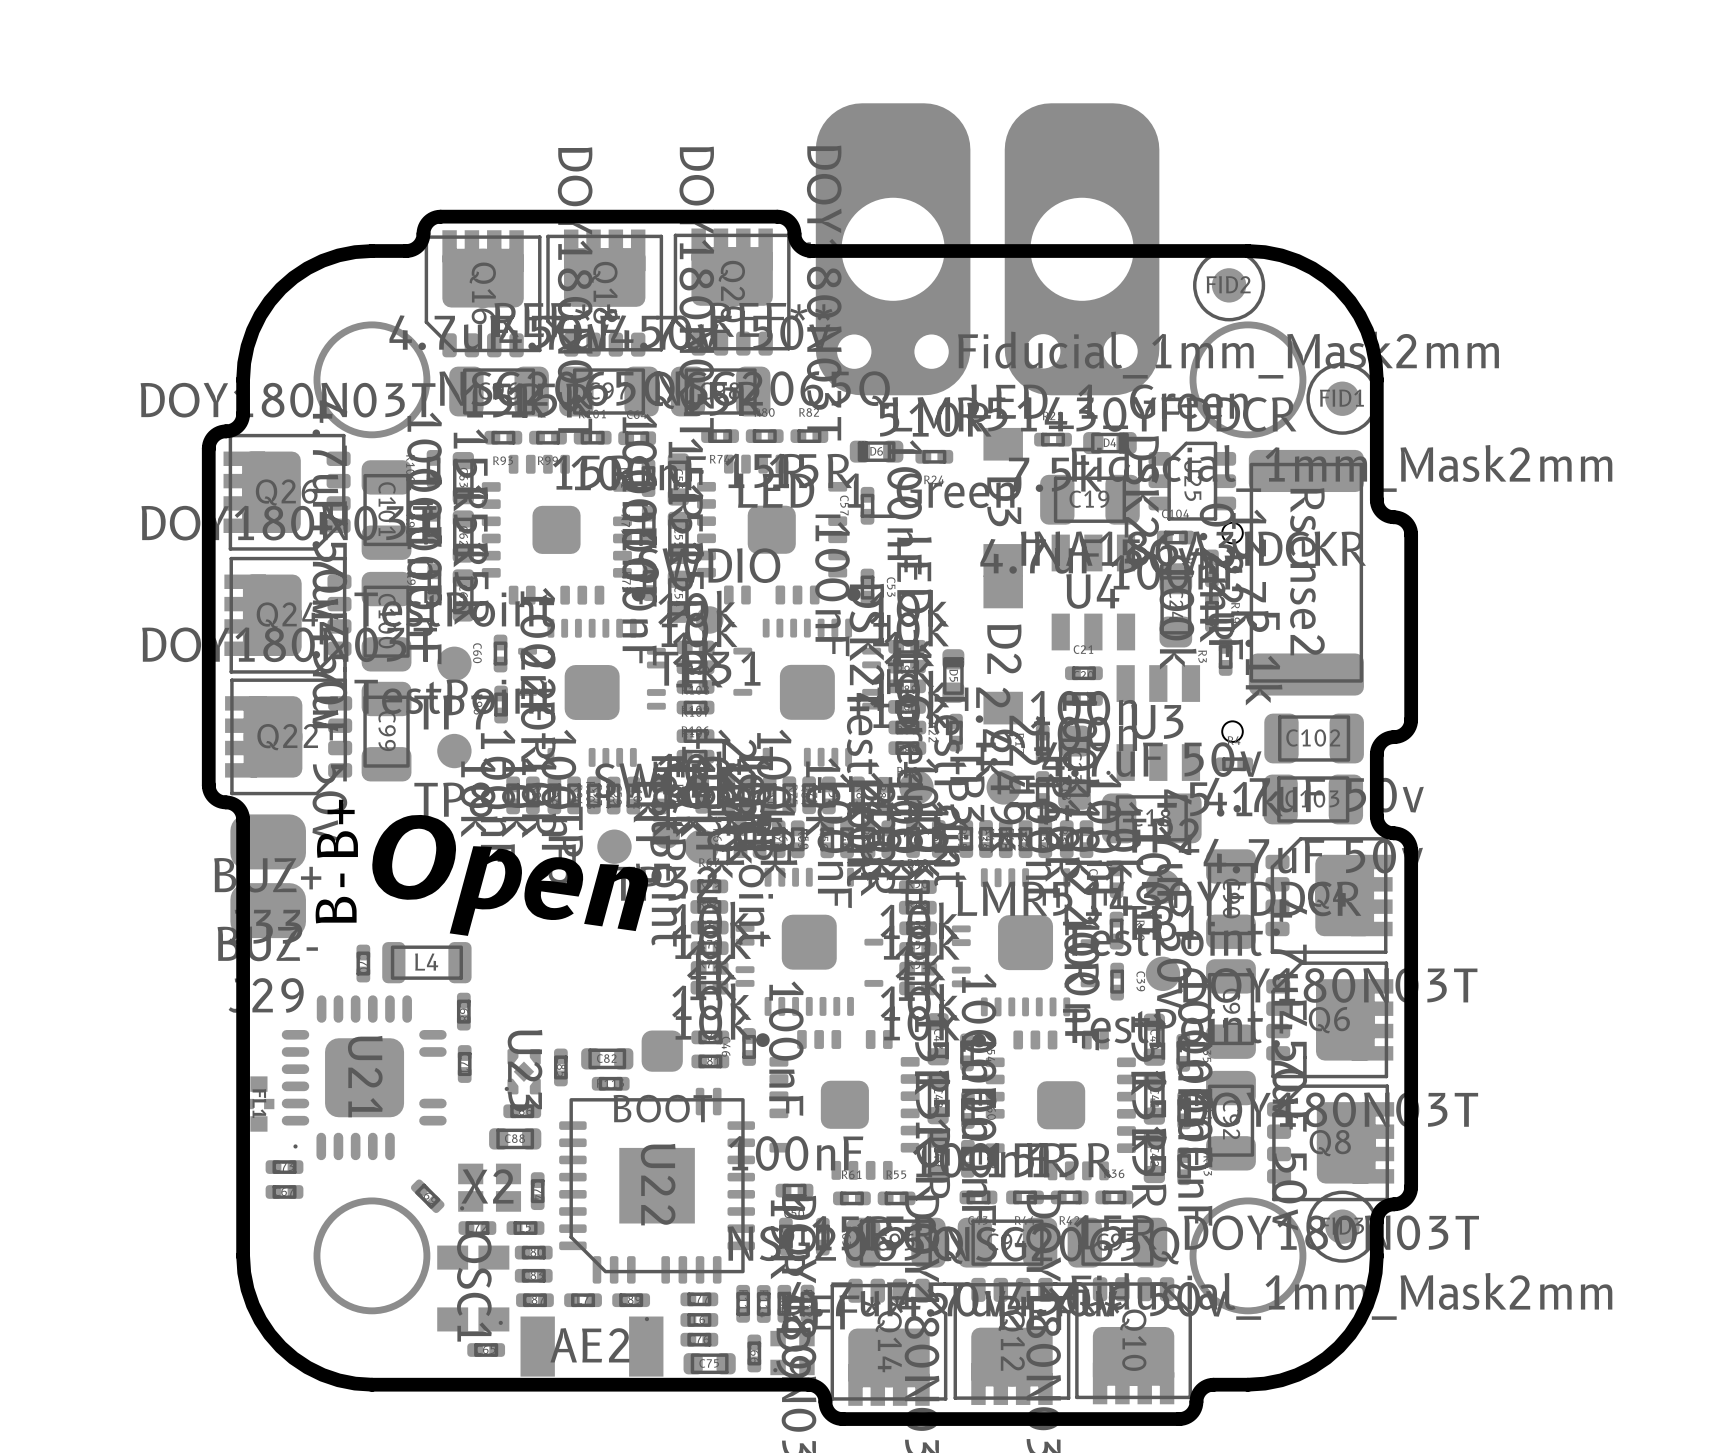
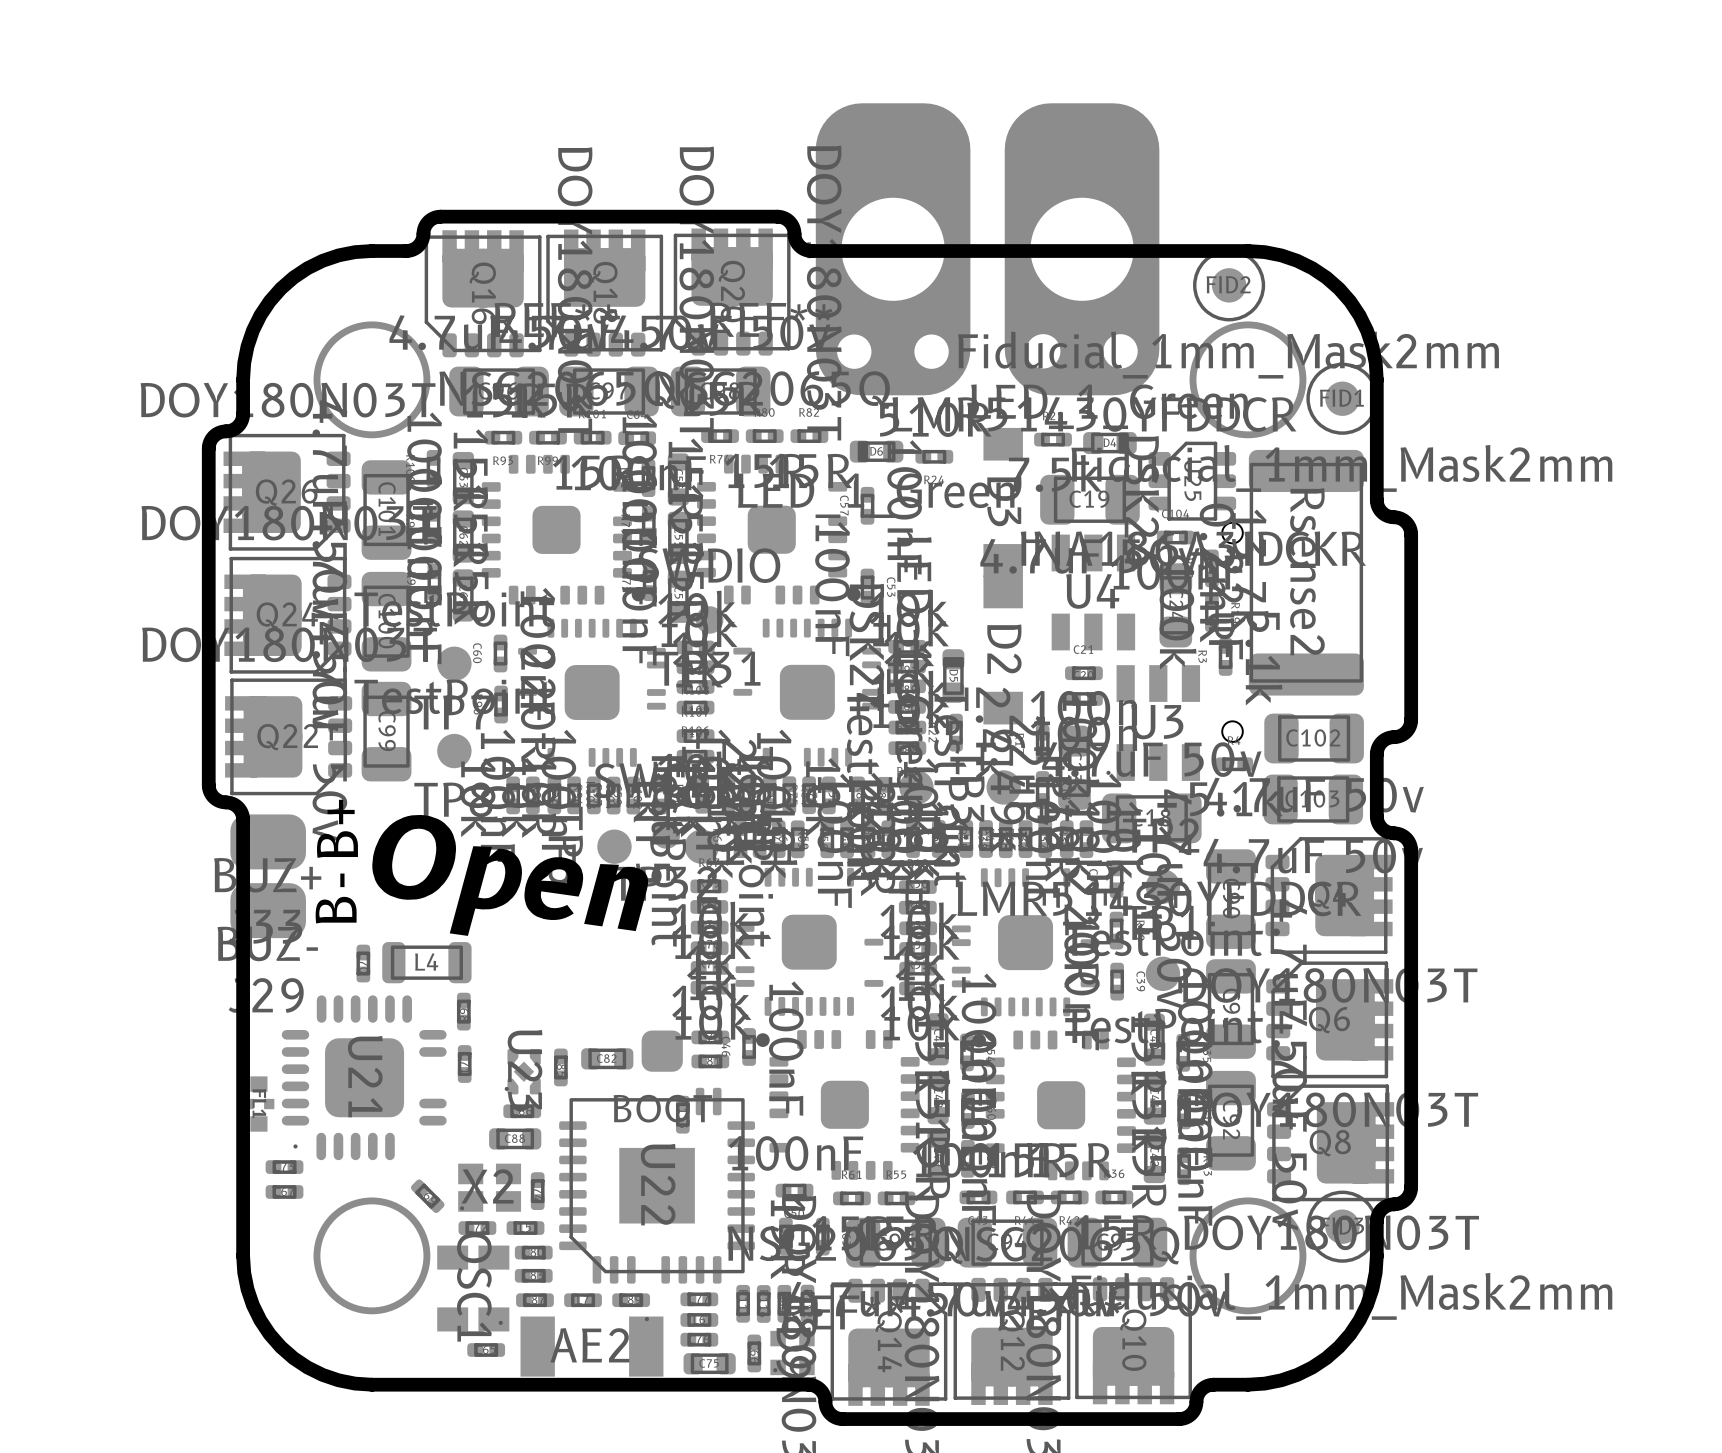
part rotation: 0° (610, 1083) -> 90° clockwise (682, 1114)
part position: (610, 1083) -> (682, 1114)

